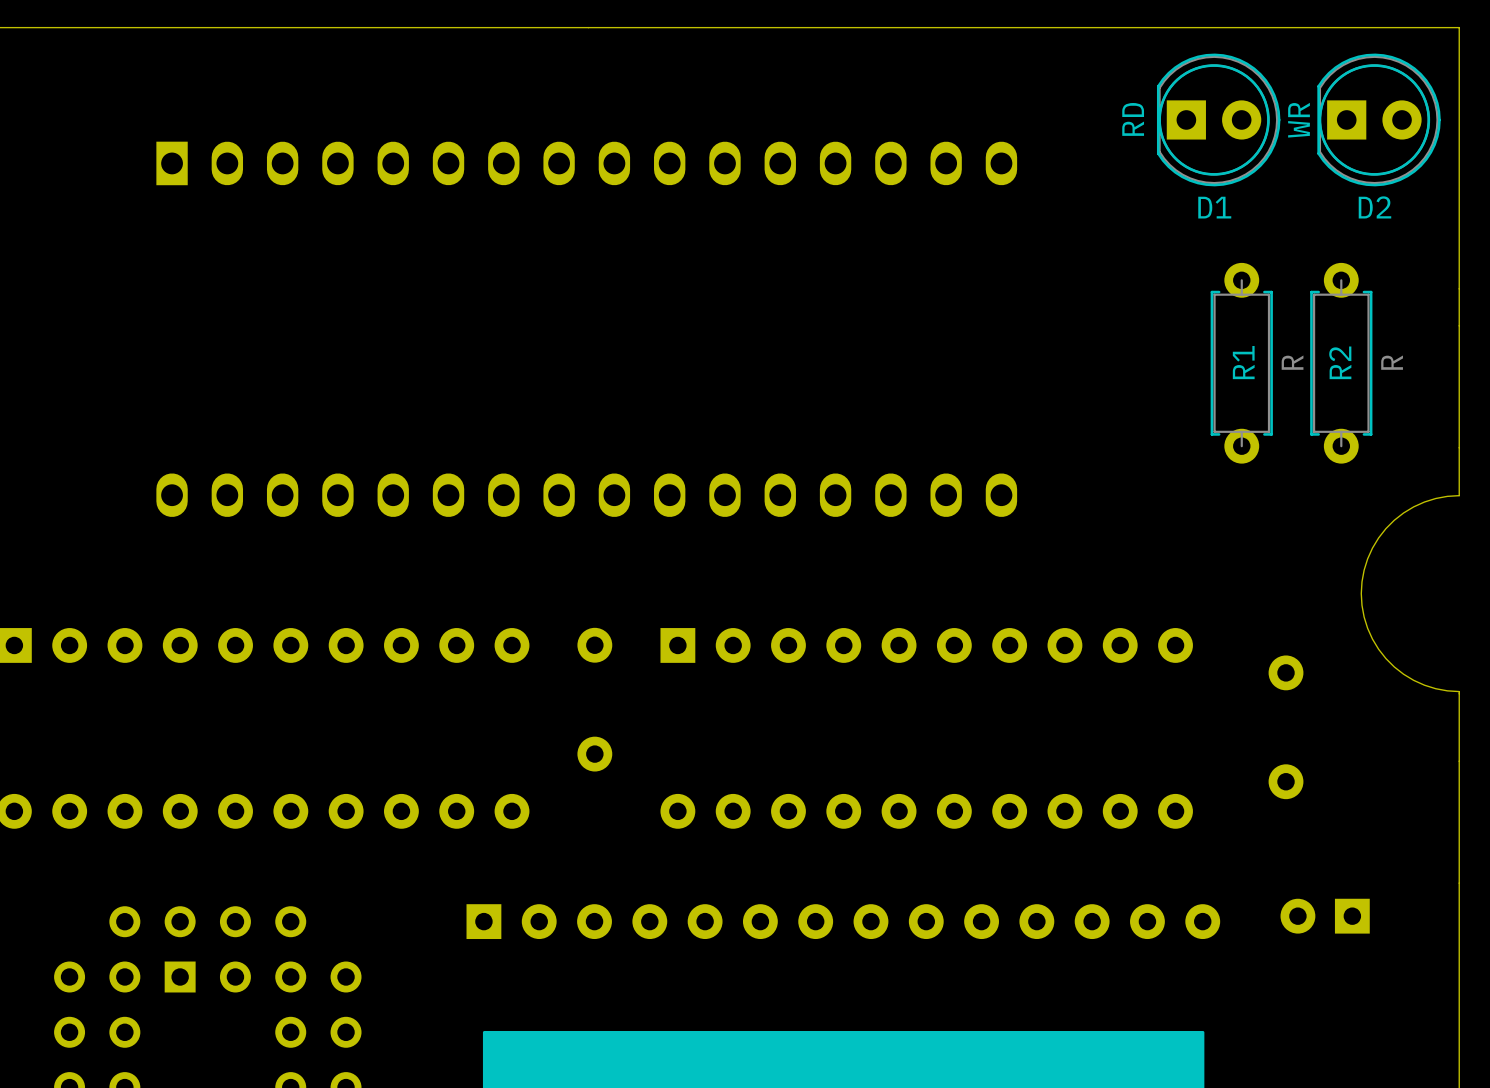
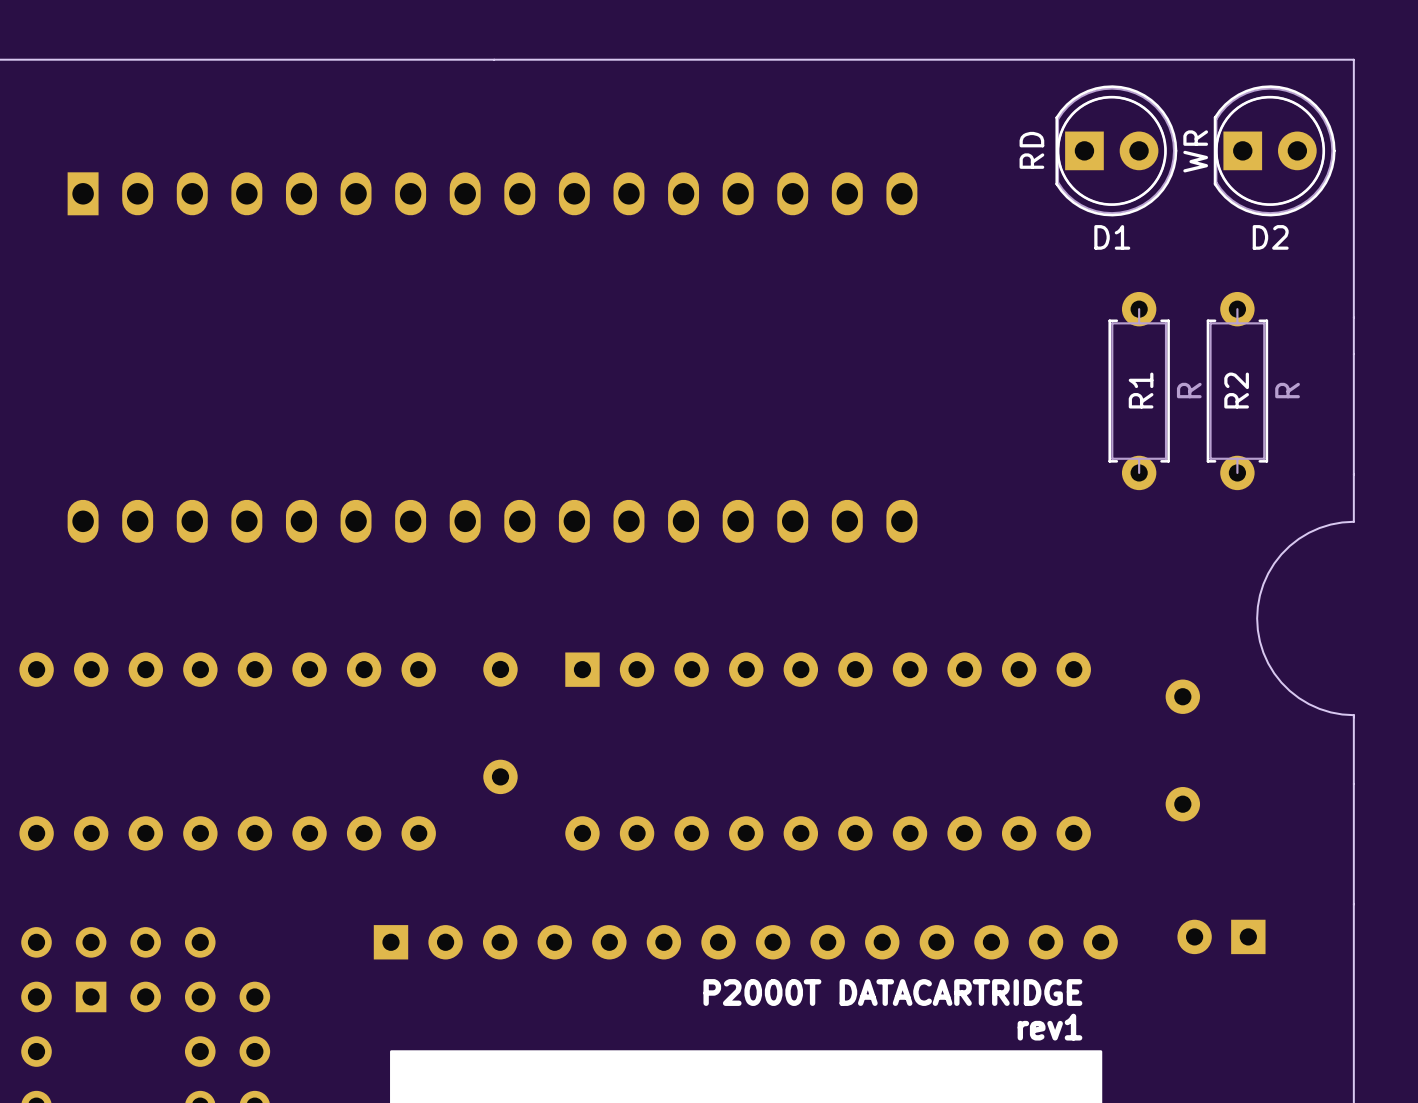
text: none -> P2000T DATACARTRIDGE (892, 992)
text: none -> rev1 (1049, 1027)

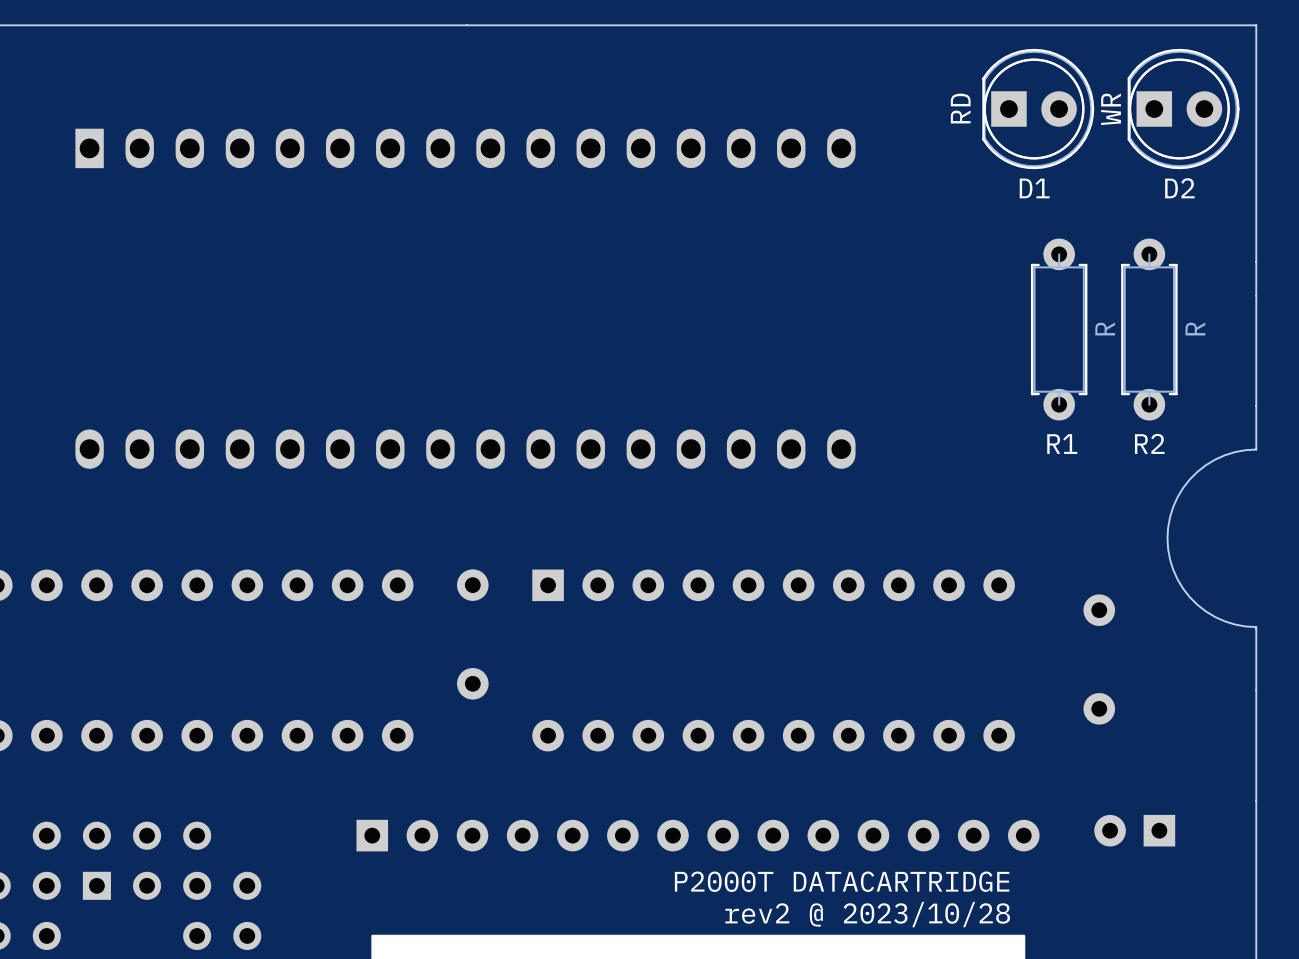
R1 name rotation: 0° (1141, 390) -> 90° clockwise (1062, 444)
R1 name position: R1 (1141, 390) -> R1 (1062, 444)
R2 name rotation: 0° (1236, 390) -> 90° clockwise (1149, 443)
R2 name position: R2 (1236, 390) -> R2 (1149, 443)
text: rev1 (1049, 1027) -> rev2 @ 2023/10/28 (867, 914)

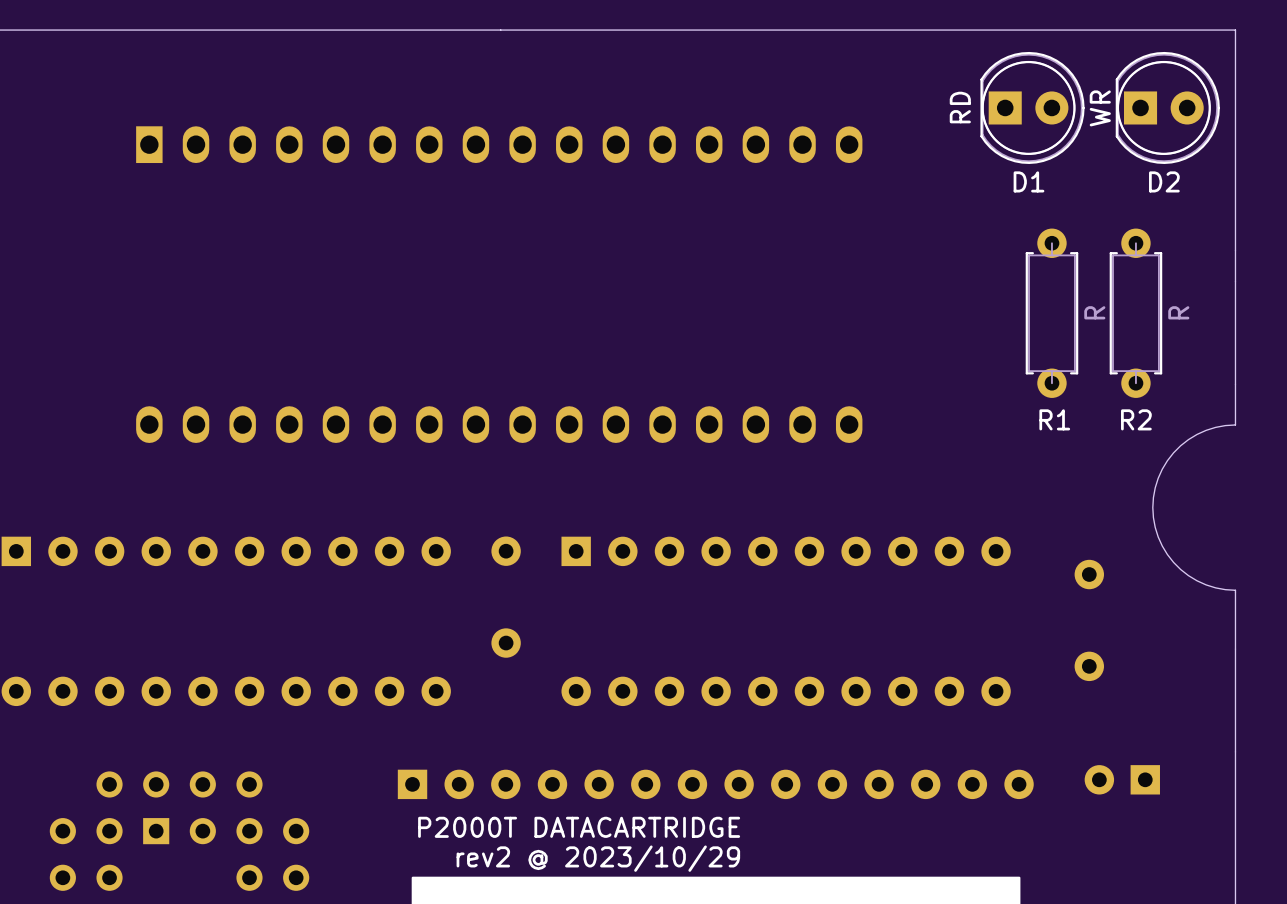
text position: P2000T DATACARTRIDGE (842, 881) -> P2000T DATACARTRIDGE (579, 827)
text: rev2 @ 2023/10/28 (867, 914) -> rev2 @ 2023/10/29 (598, 858)

